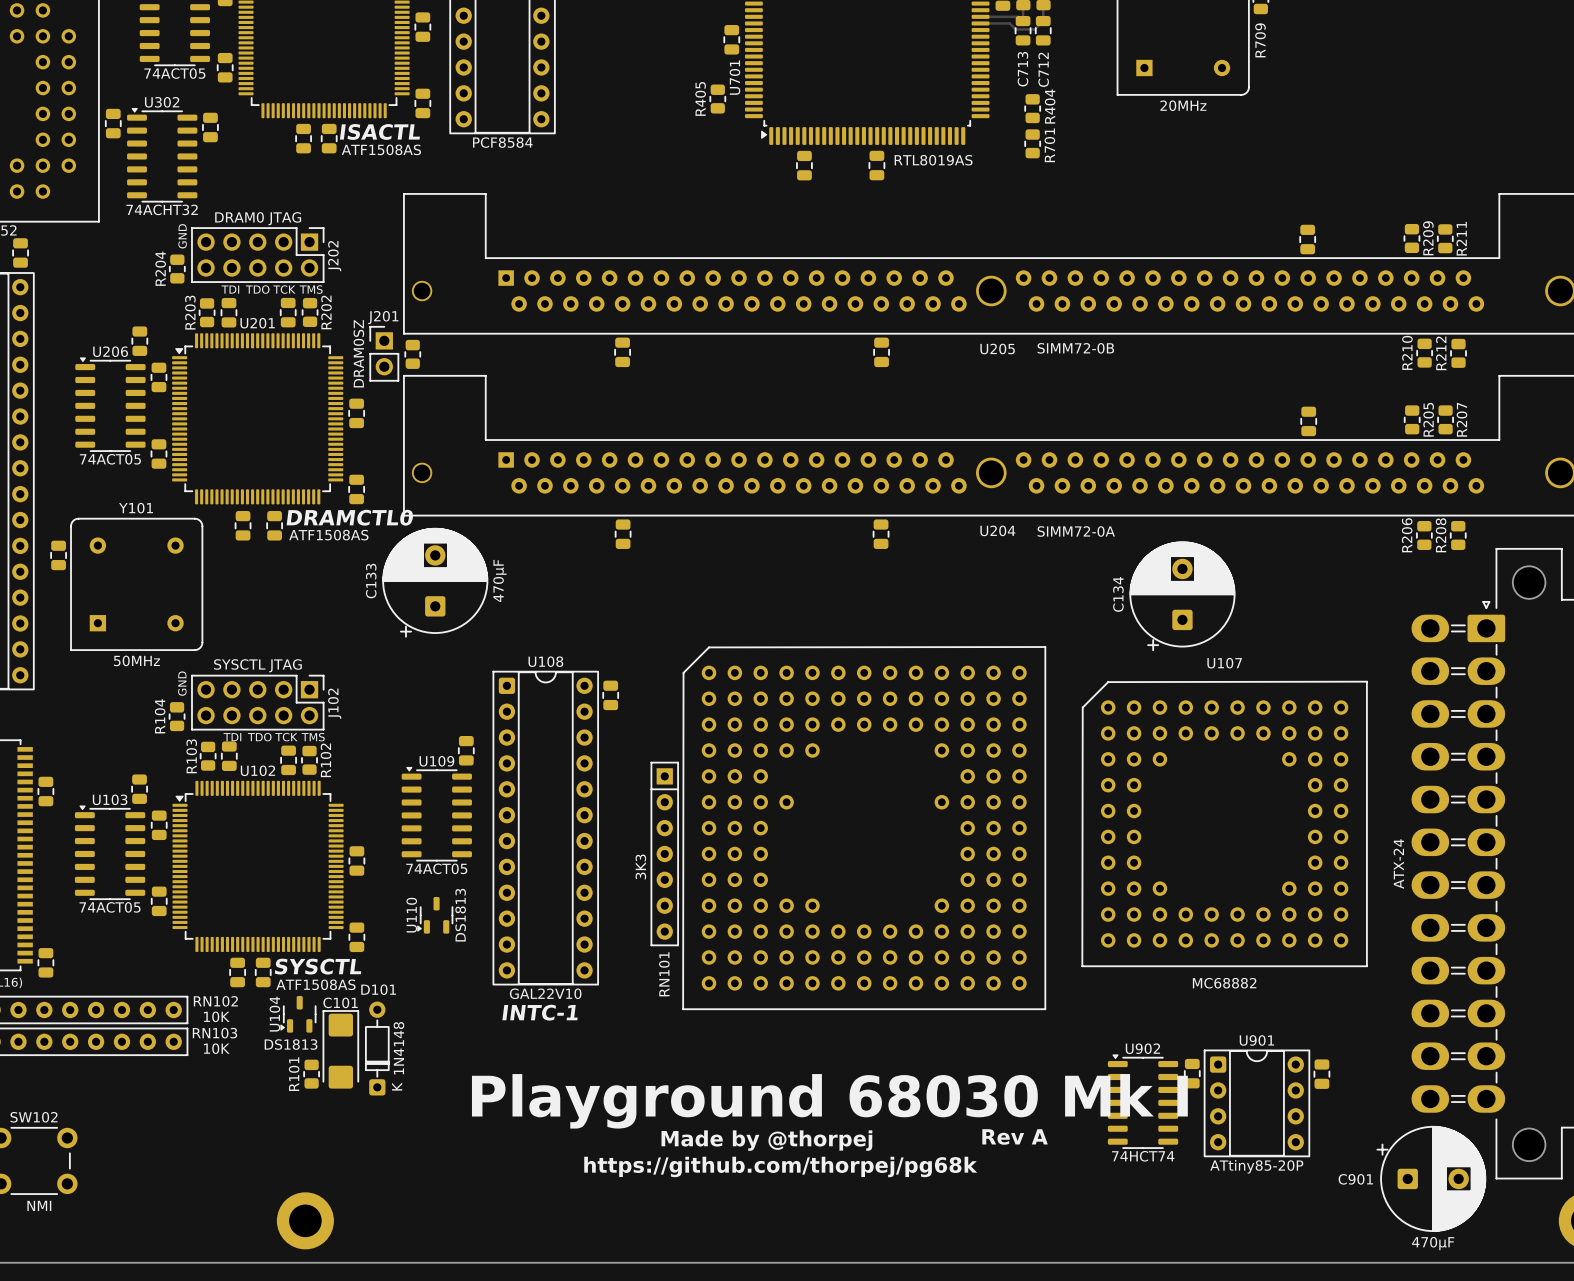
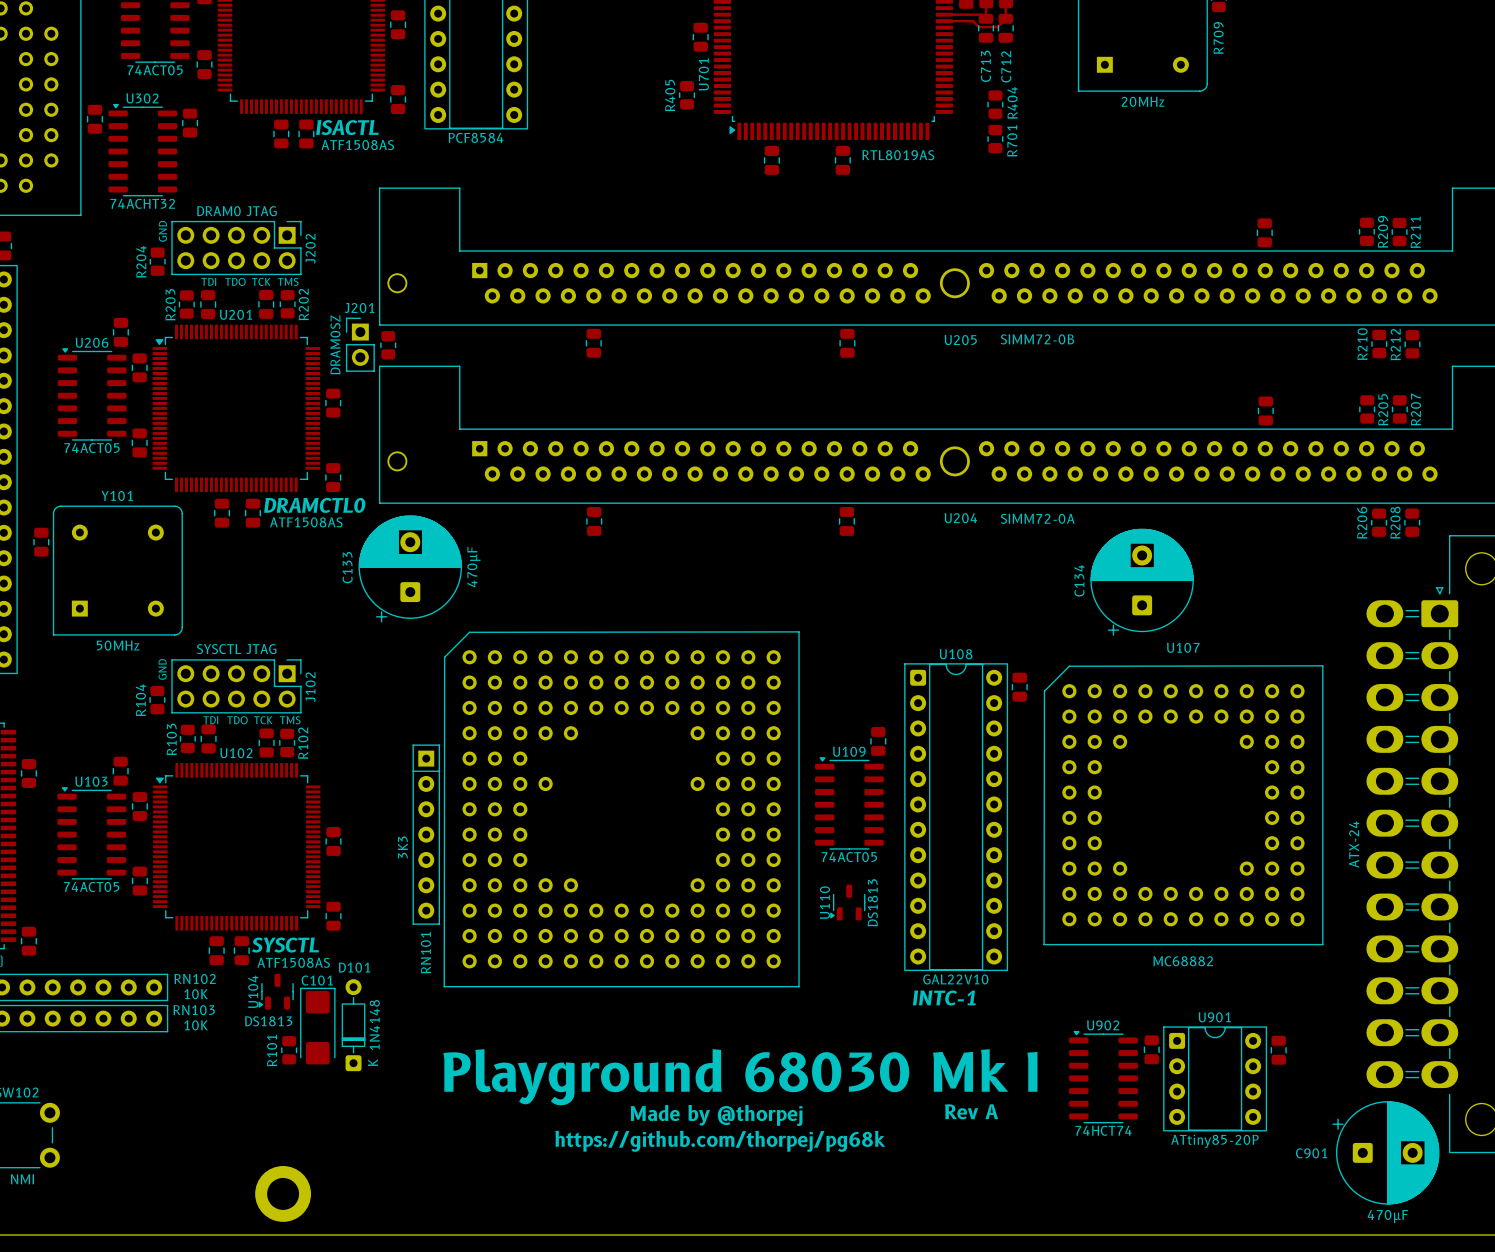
part: (610, 695) -> none
part: none -> (1019, 687)
part: (466, 750) -> none
part: none -> (878, 741)
U109 position: (436, 814) -> (849, 803)
U108 position: (545, 828) -> (956, 817)
part position: (864, 828) -> (621, 809)
RN101 position: (664, 853) -> (426, 834)
U110 position: (435, 915) -> (847, 902)
text: INTC-1 (540, 1012) -> none
text: none -> INTC-1 (944, 997)

